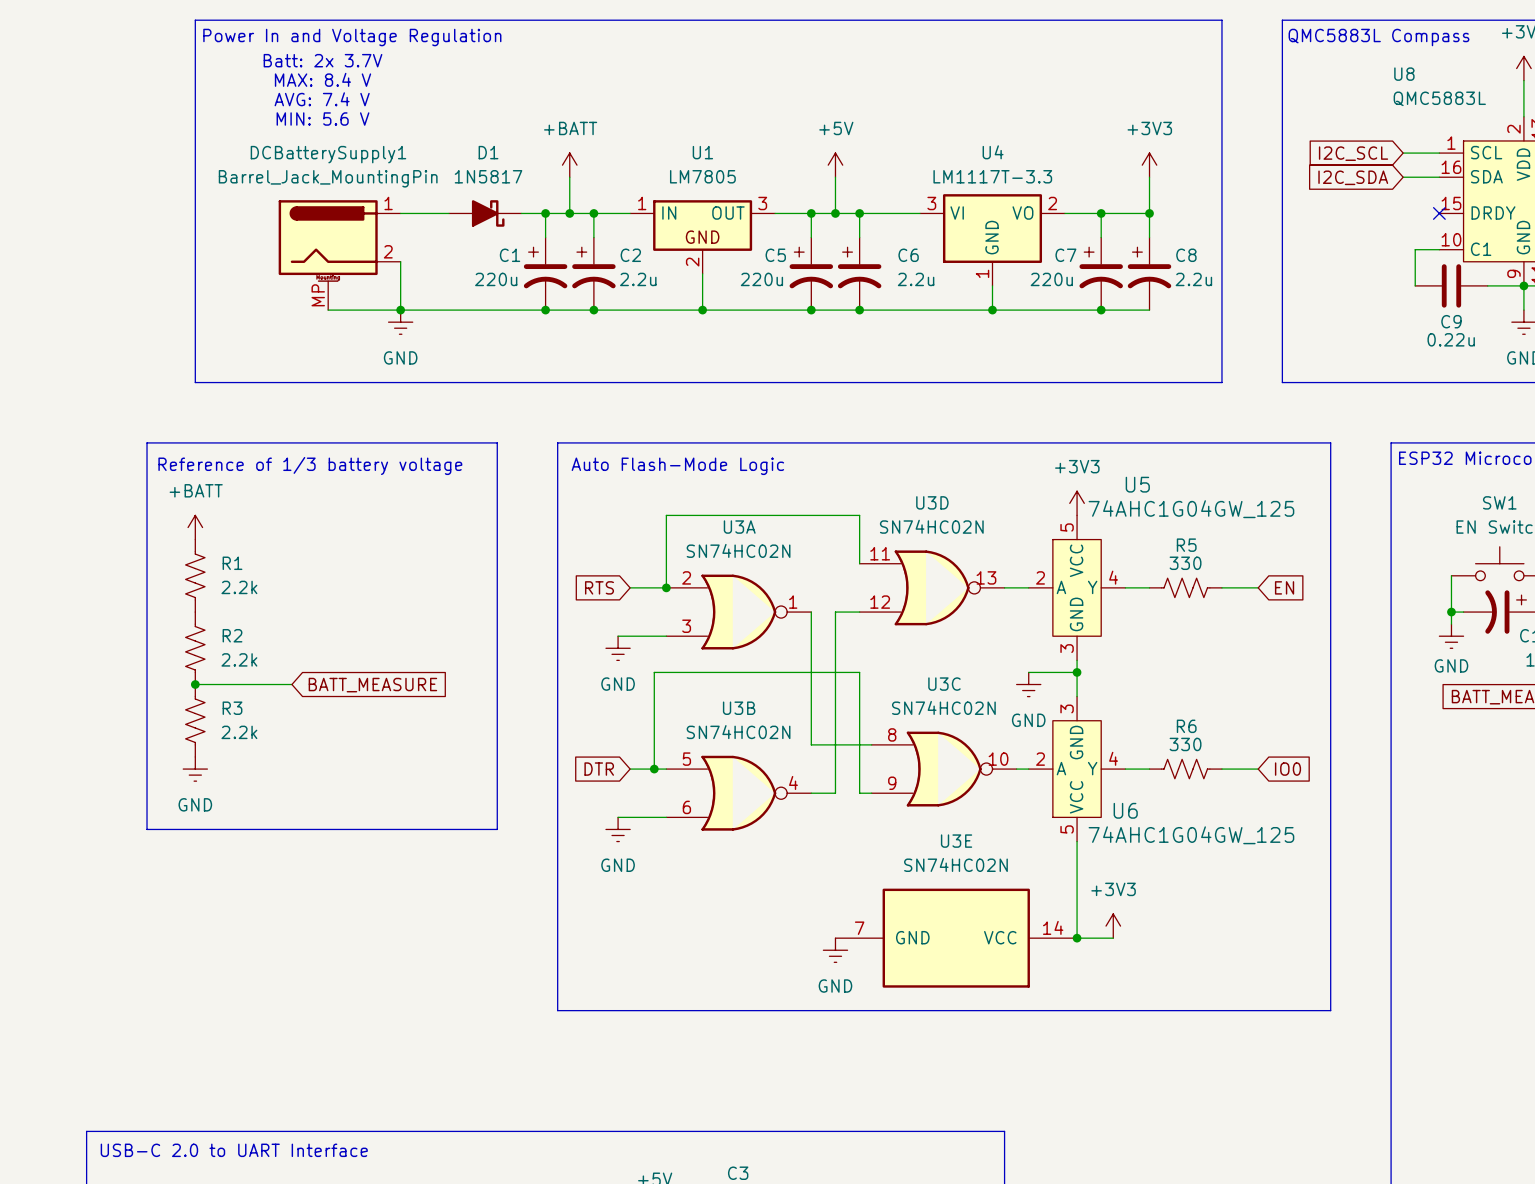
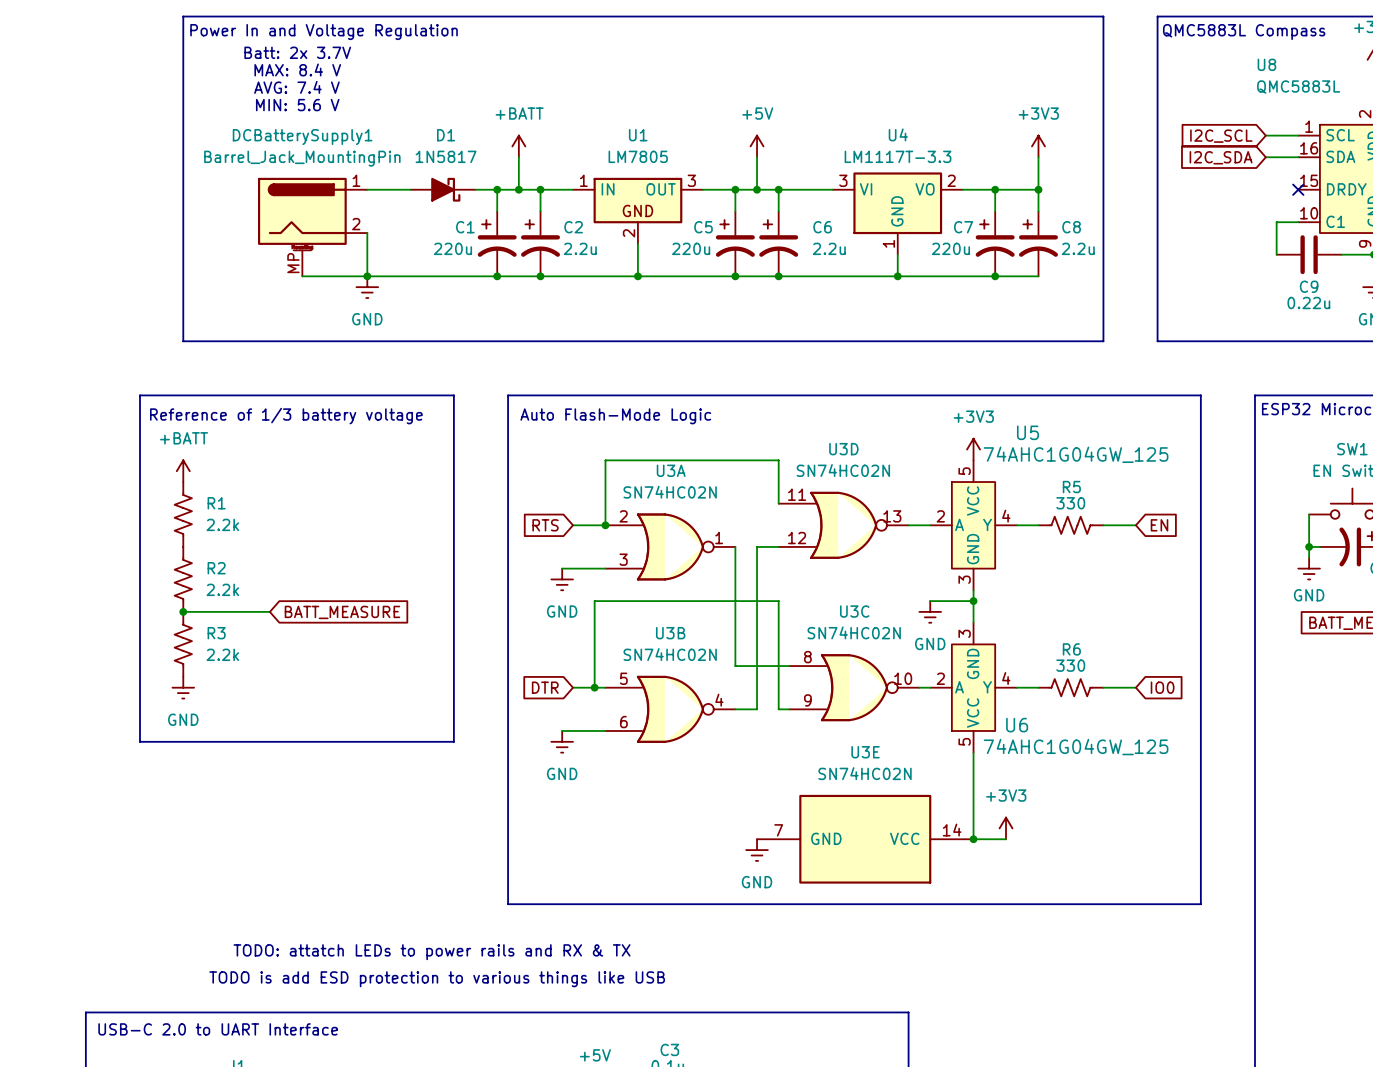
text: none -> TODO: attatch LEDs to power rails and RX & TX (432, 952)
text: none -> TODO is add ESD protection to various things like USB (437, 979)

